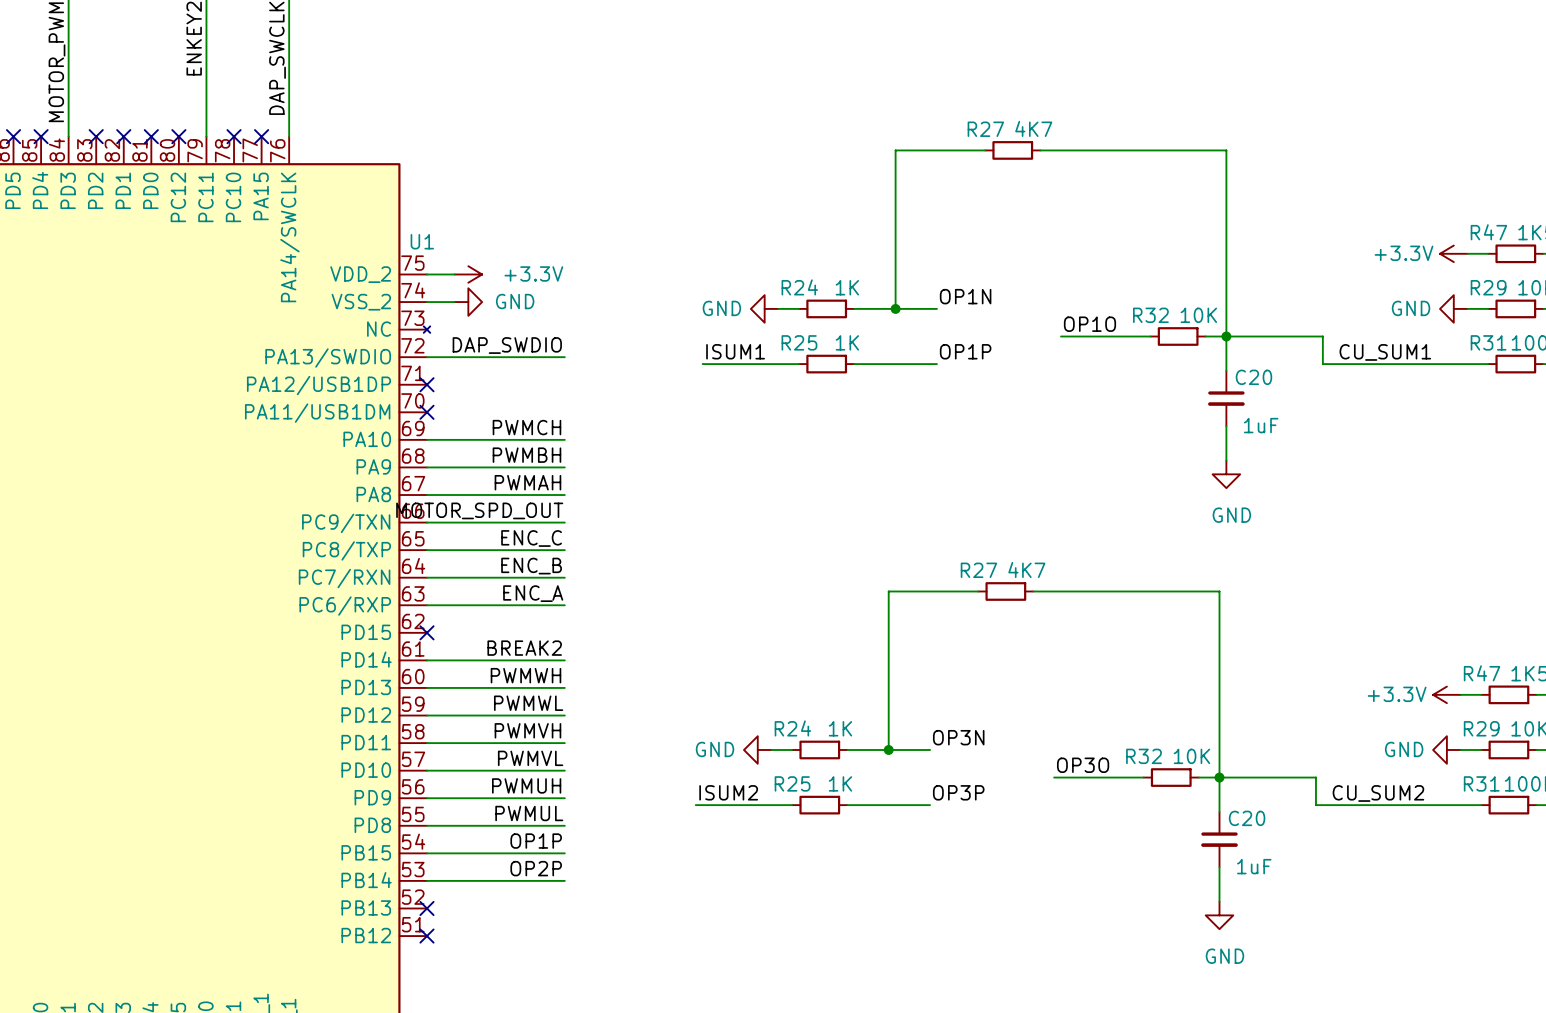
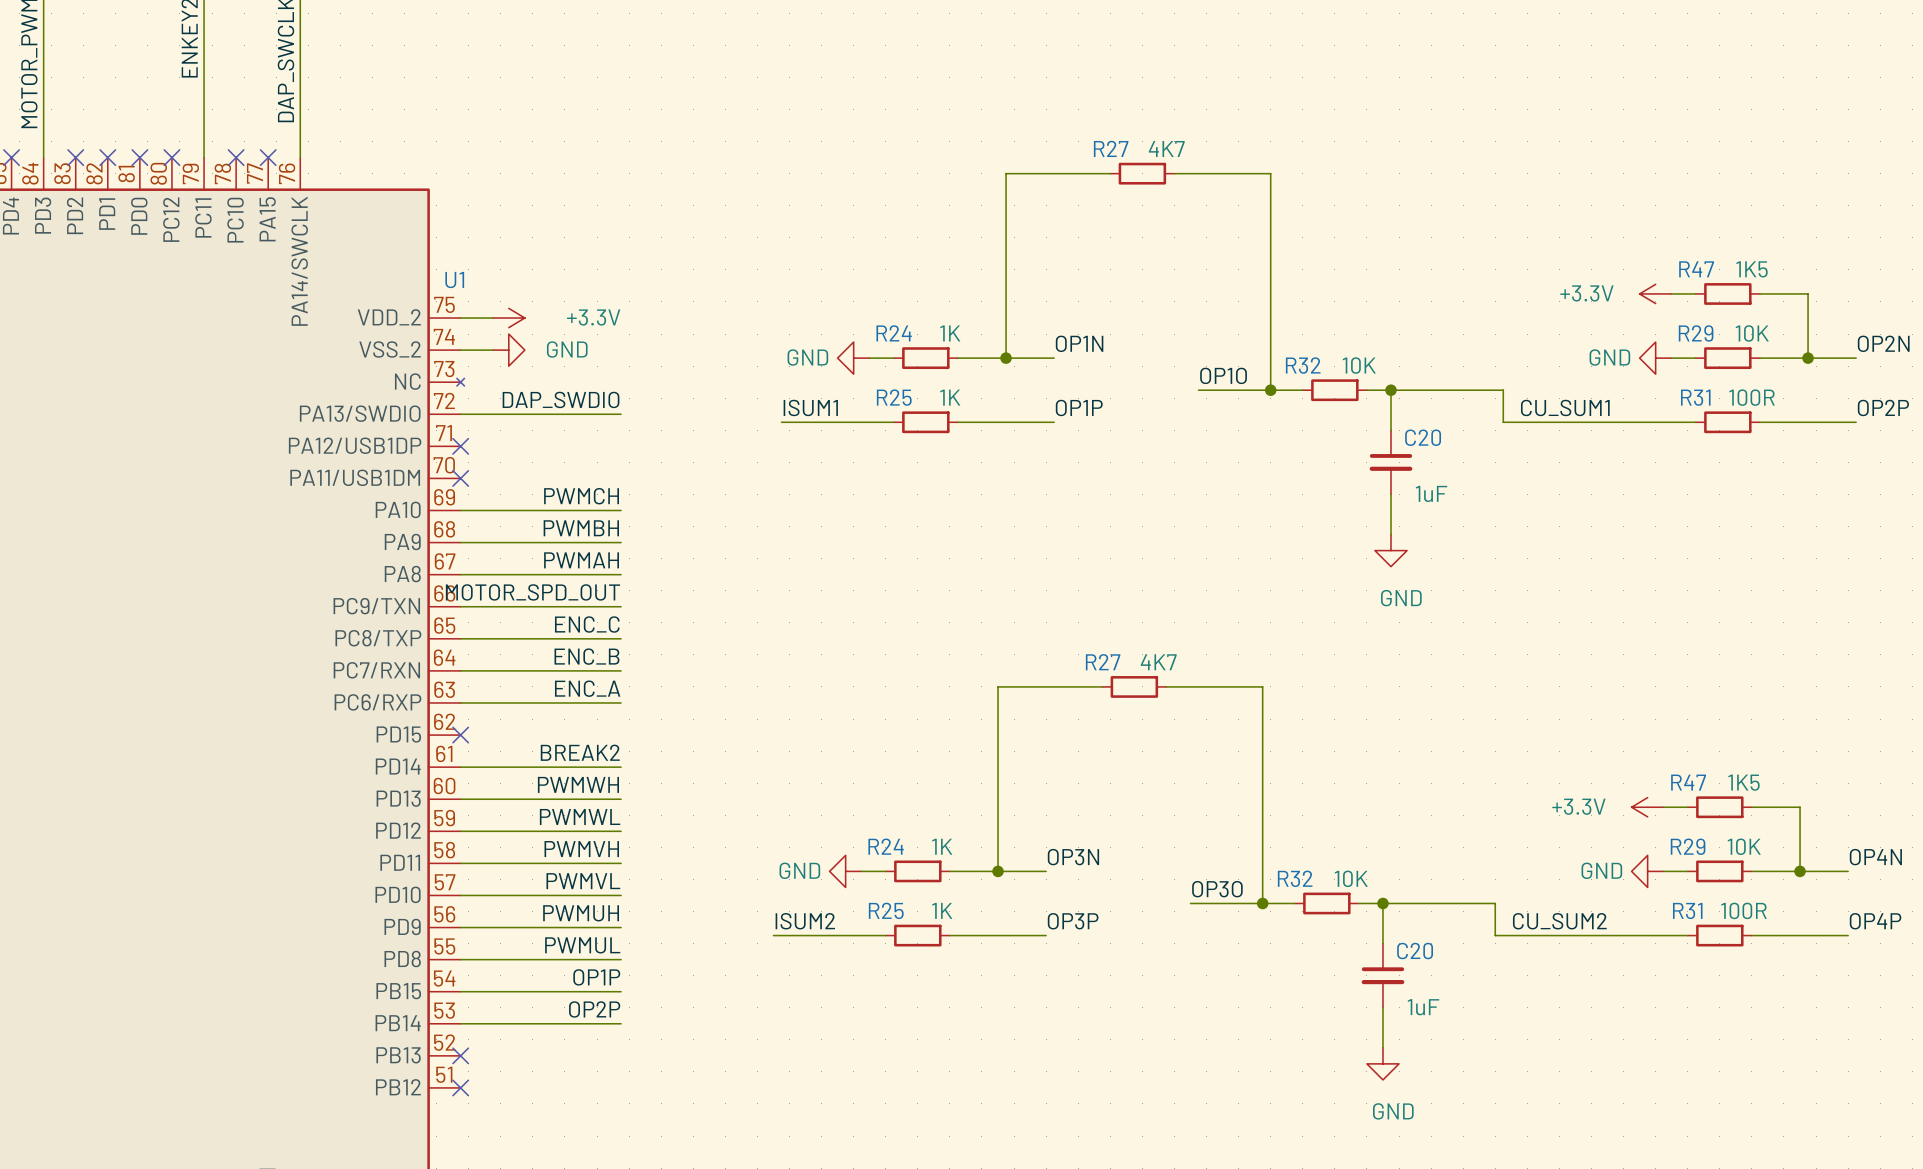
wire: (1123, 150) (1226, 150) (1226, 336) -> (1270, 173) (1270, 390)
junction: none -> (1270, 390)
wire: (1116, 591) (1219, 591) (1219, 777) -> (1262, 686) (1262, 903)
junction: none -> (1262, 903)

